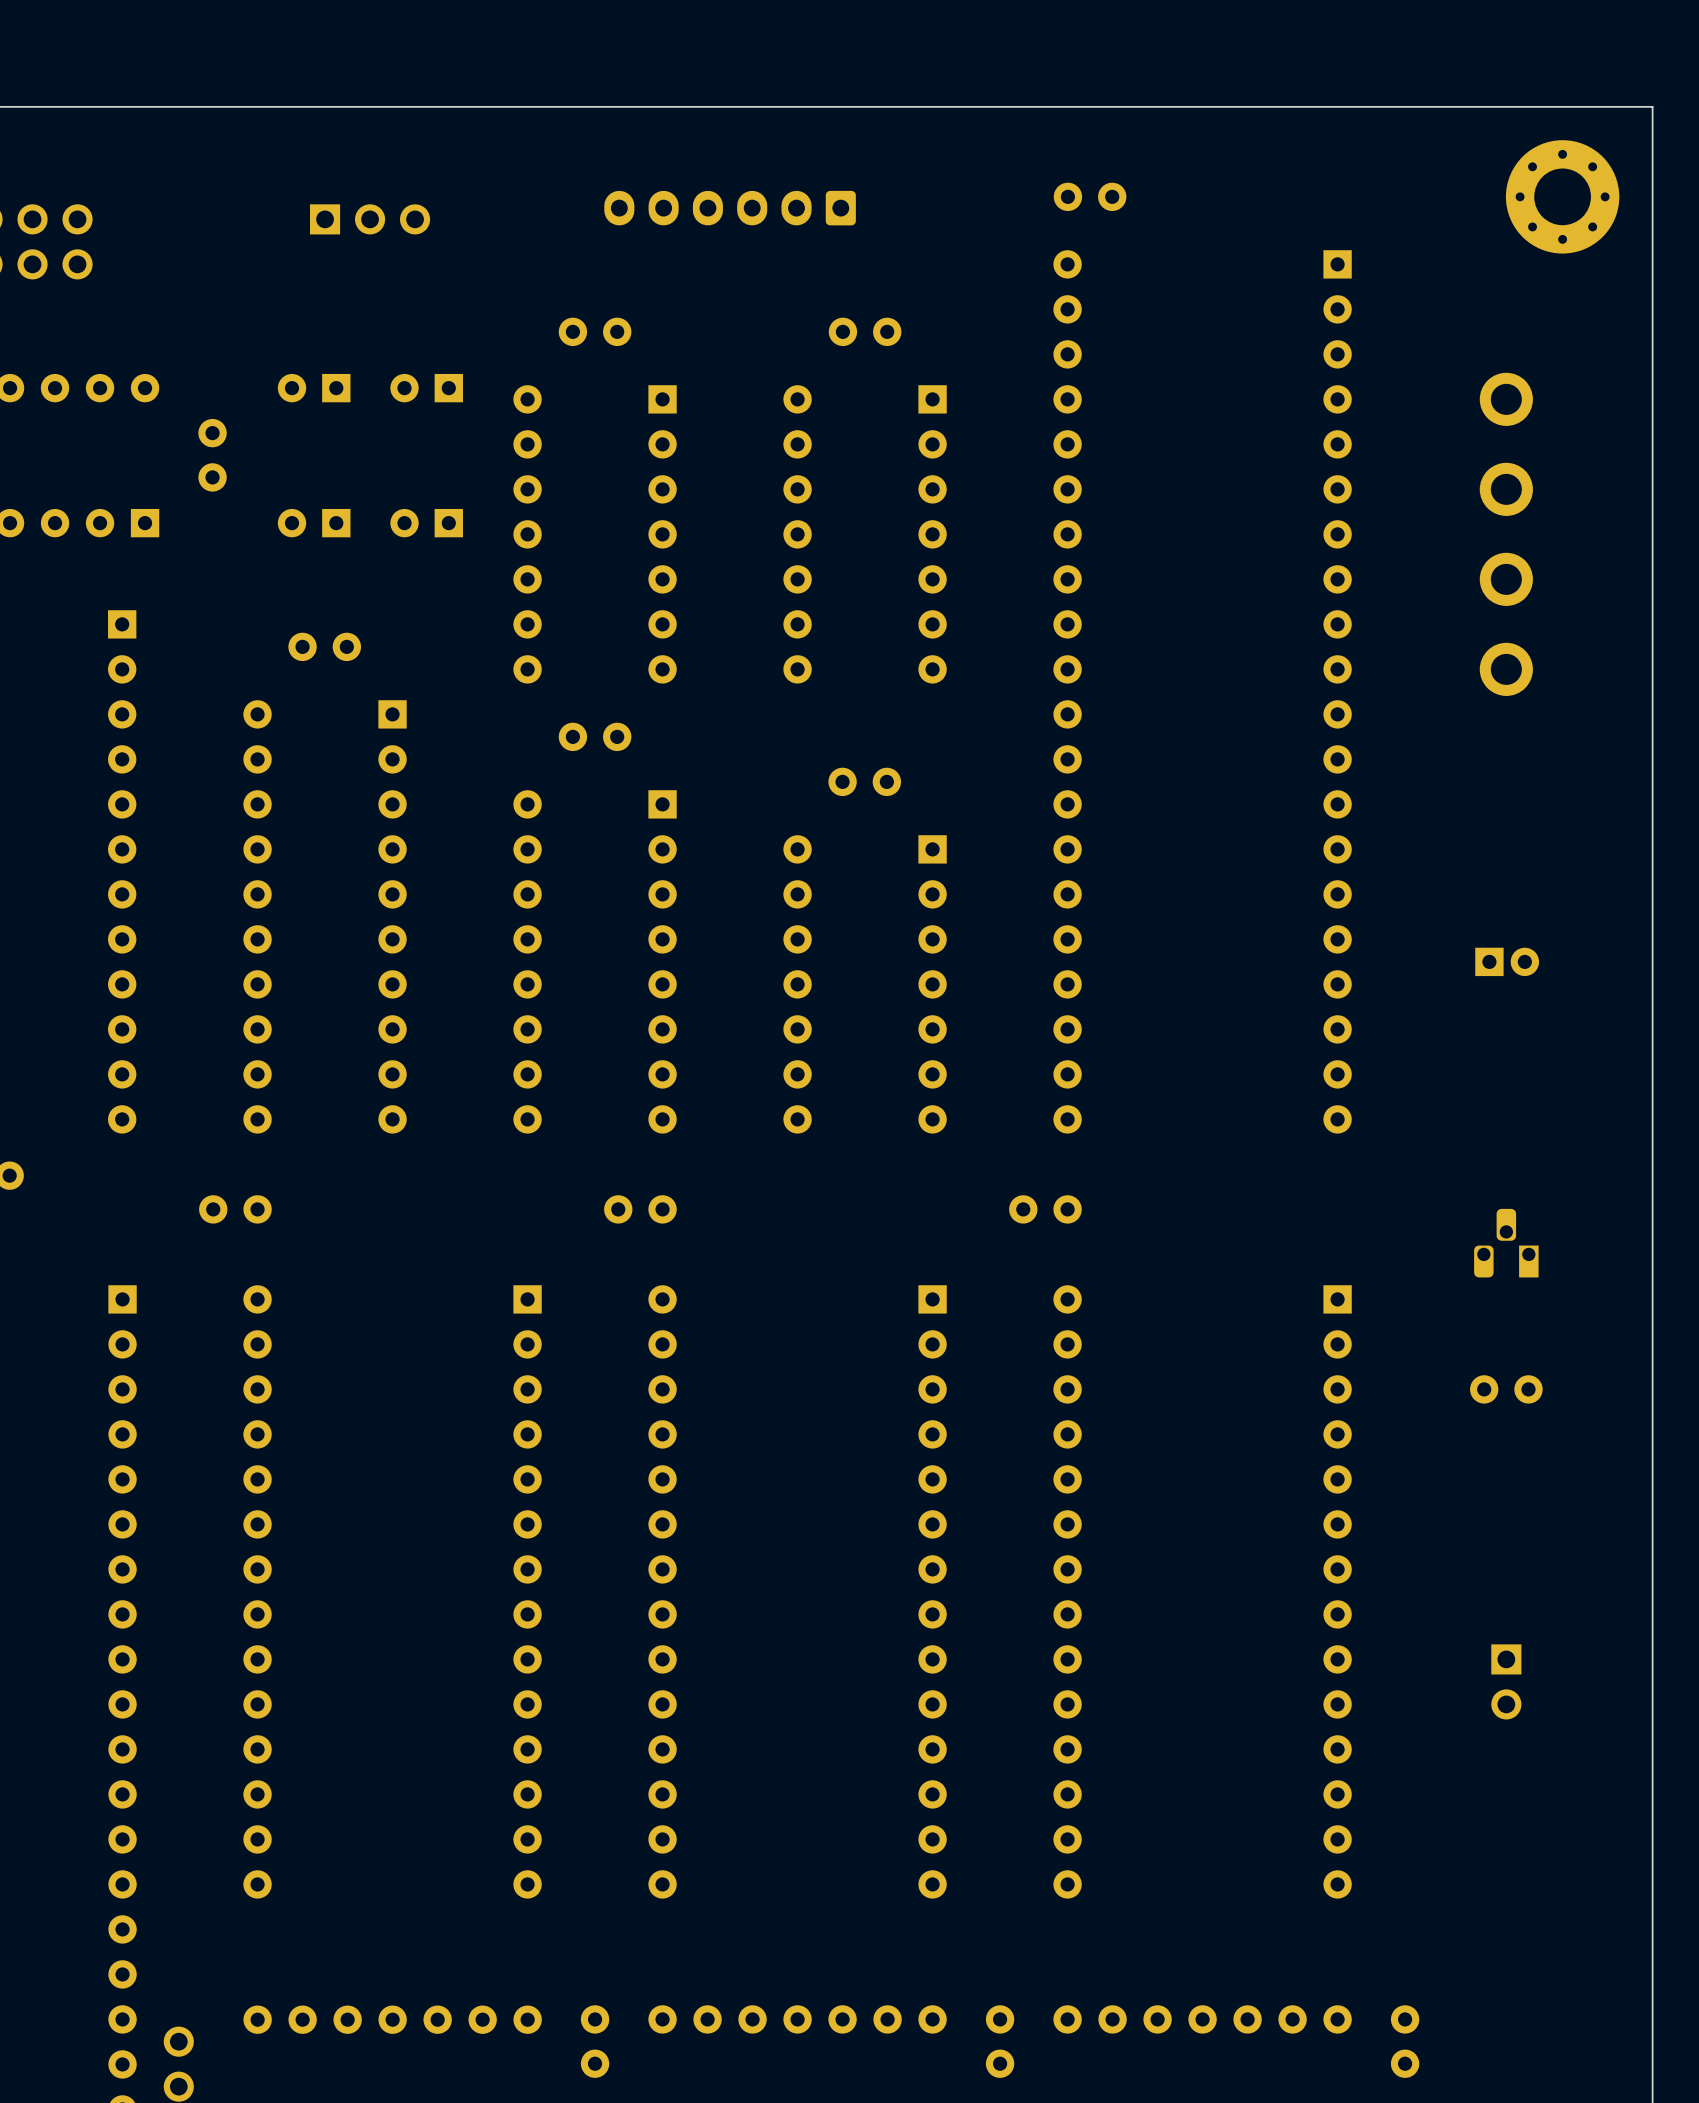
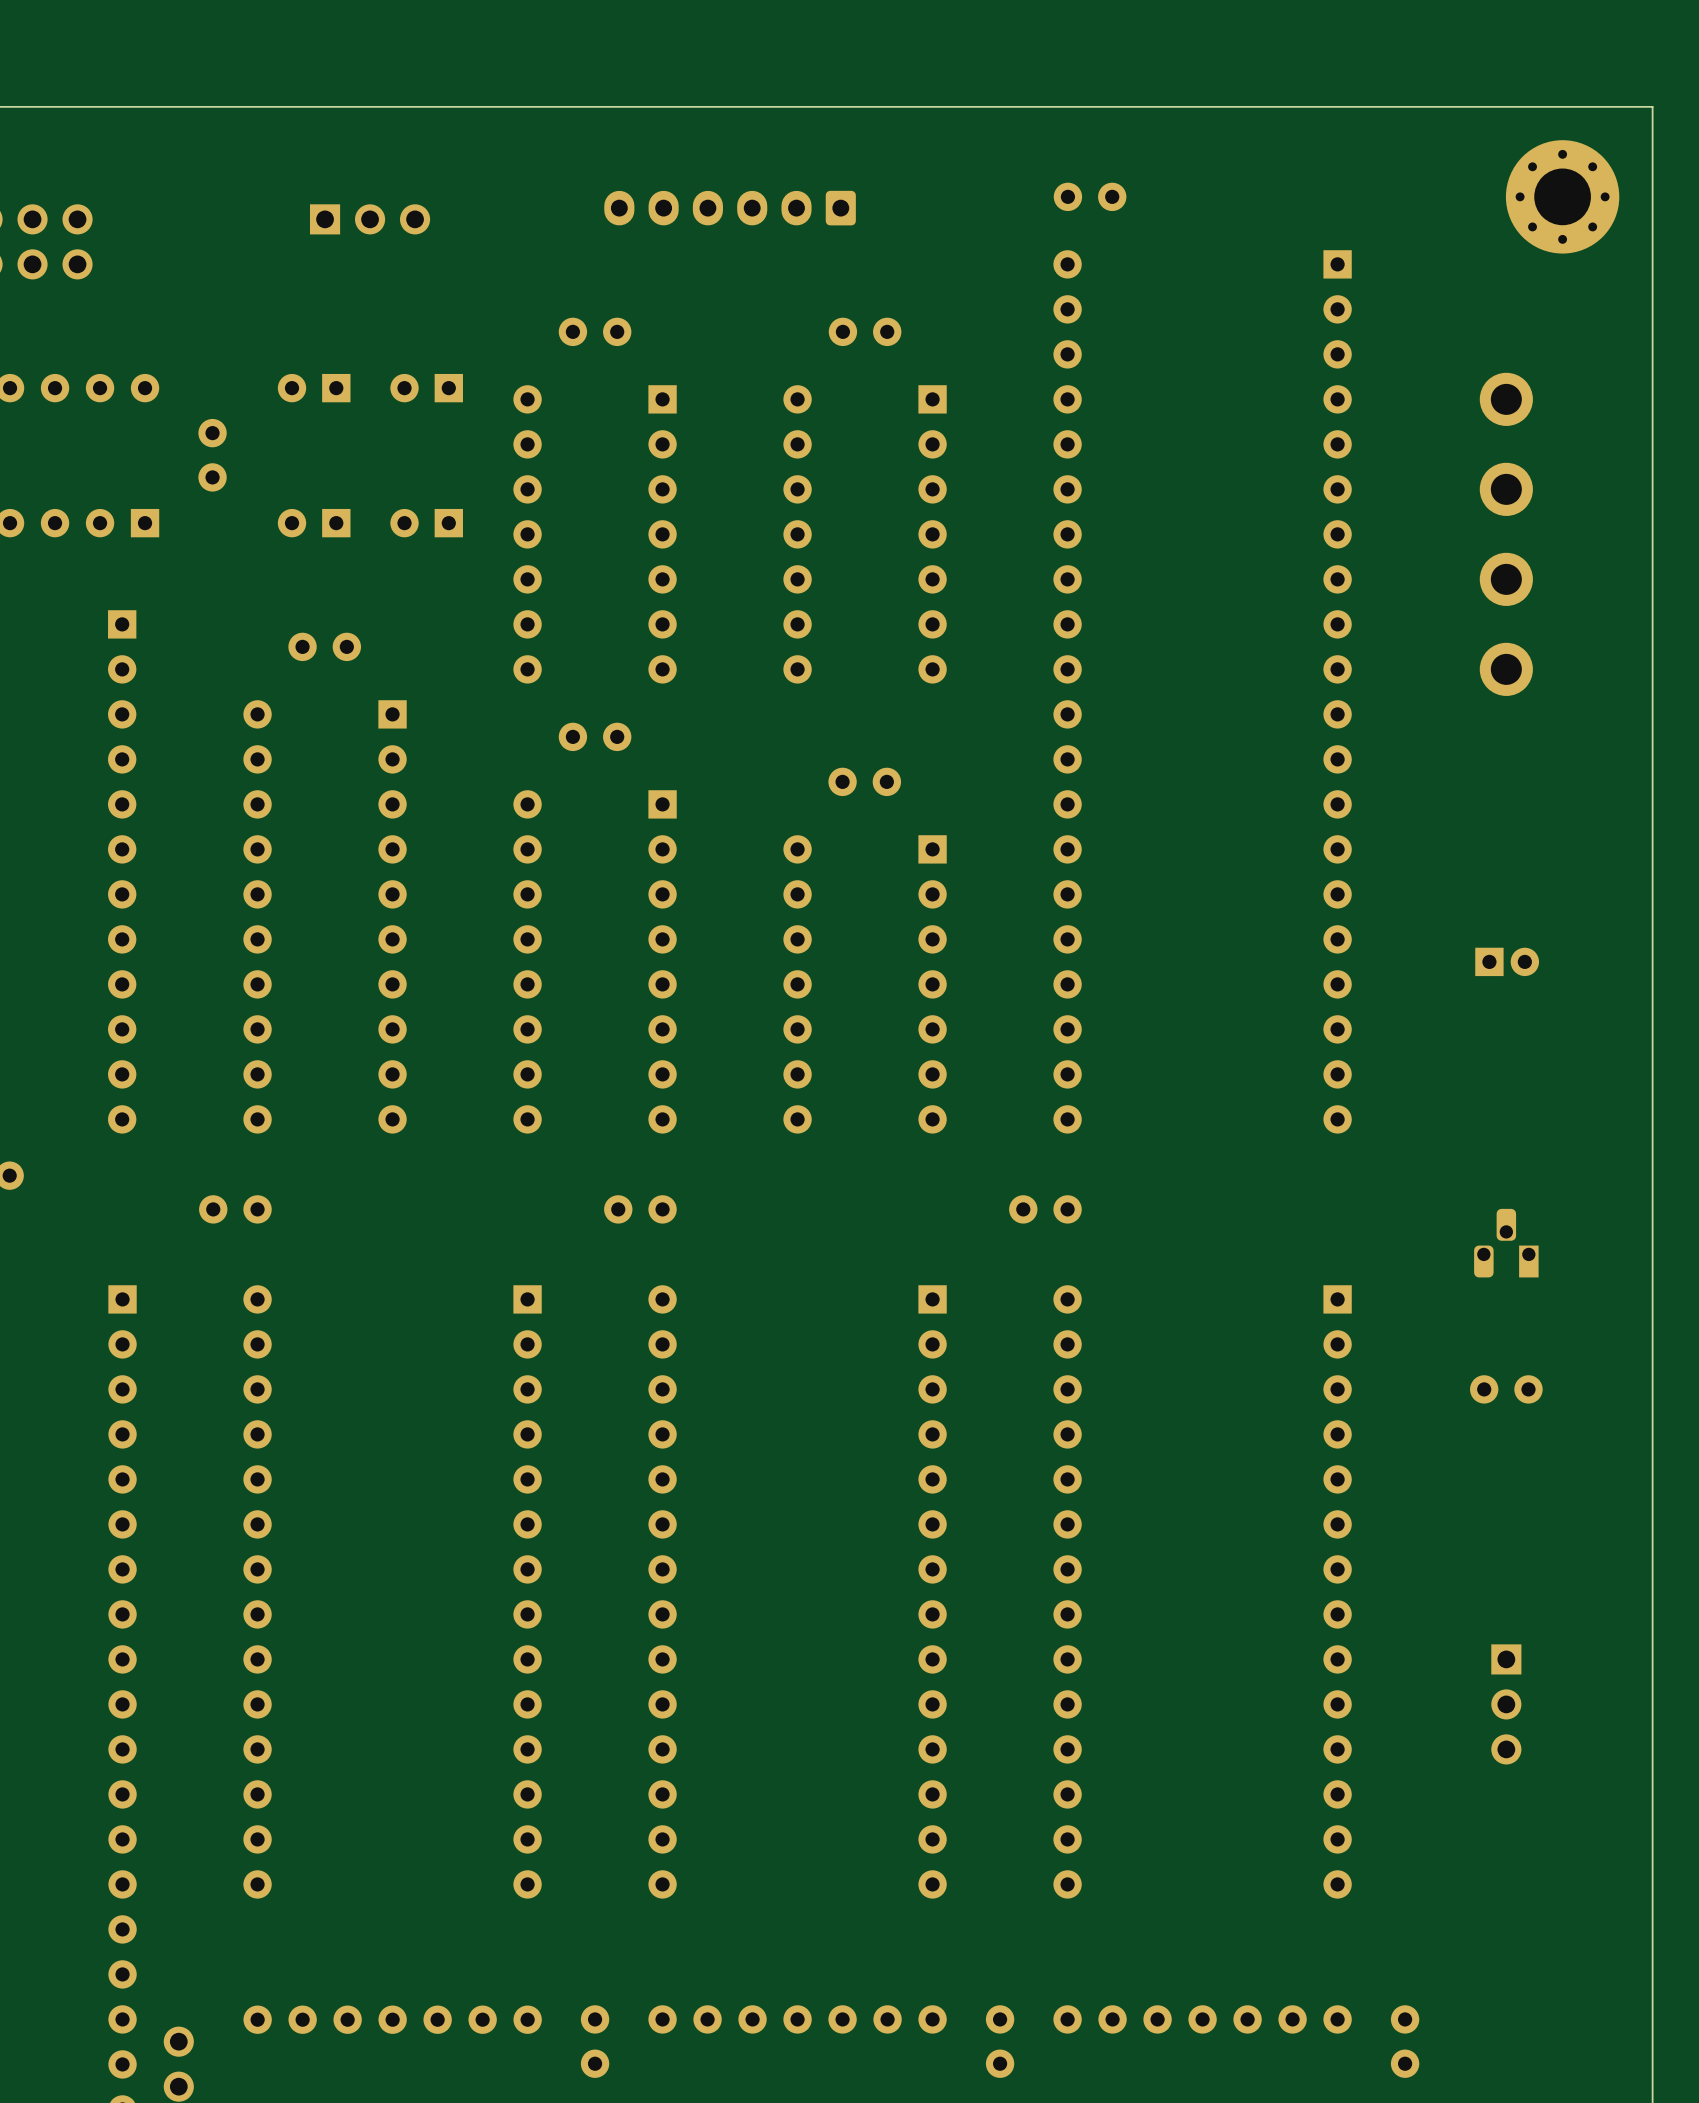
part: none -> (1506, 1704)

